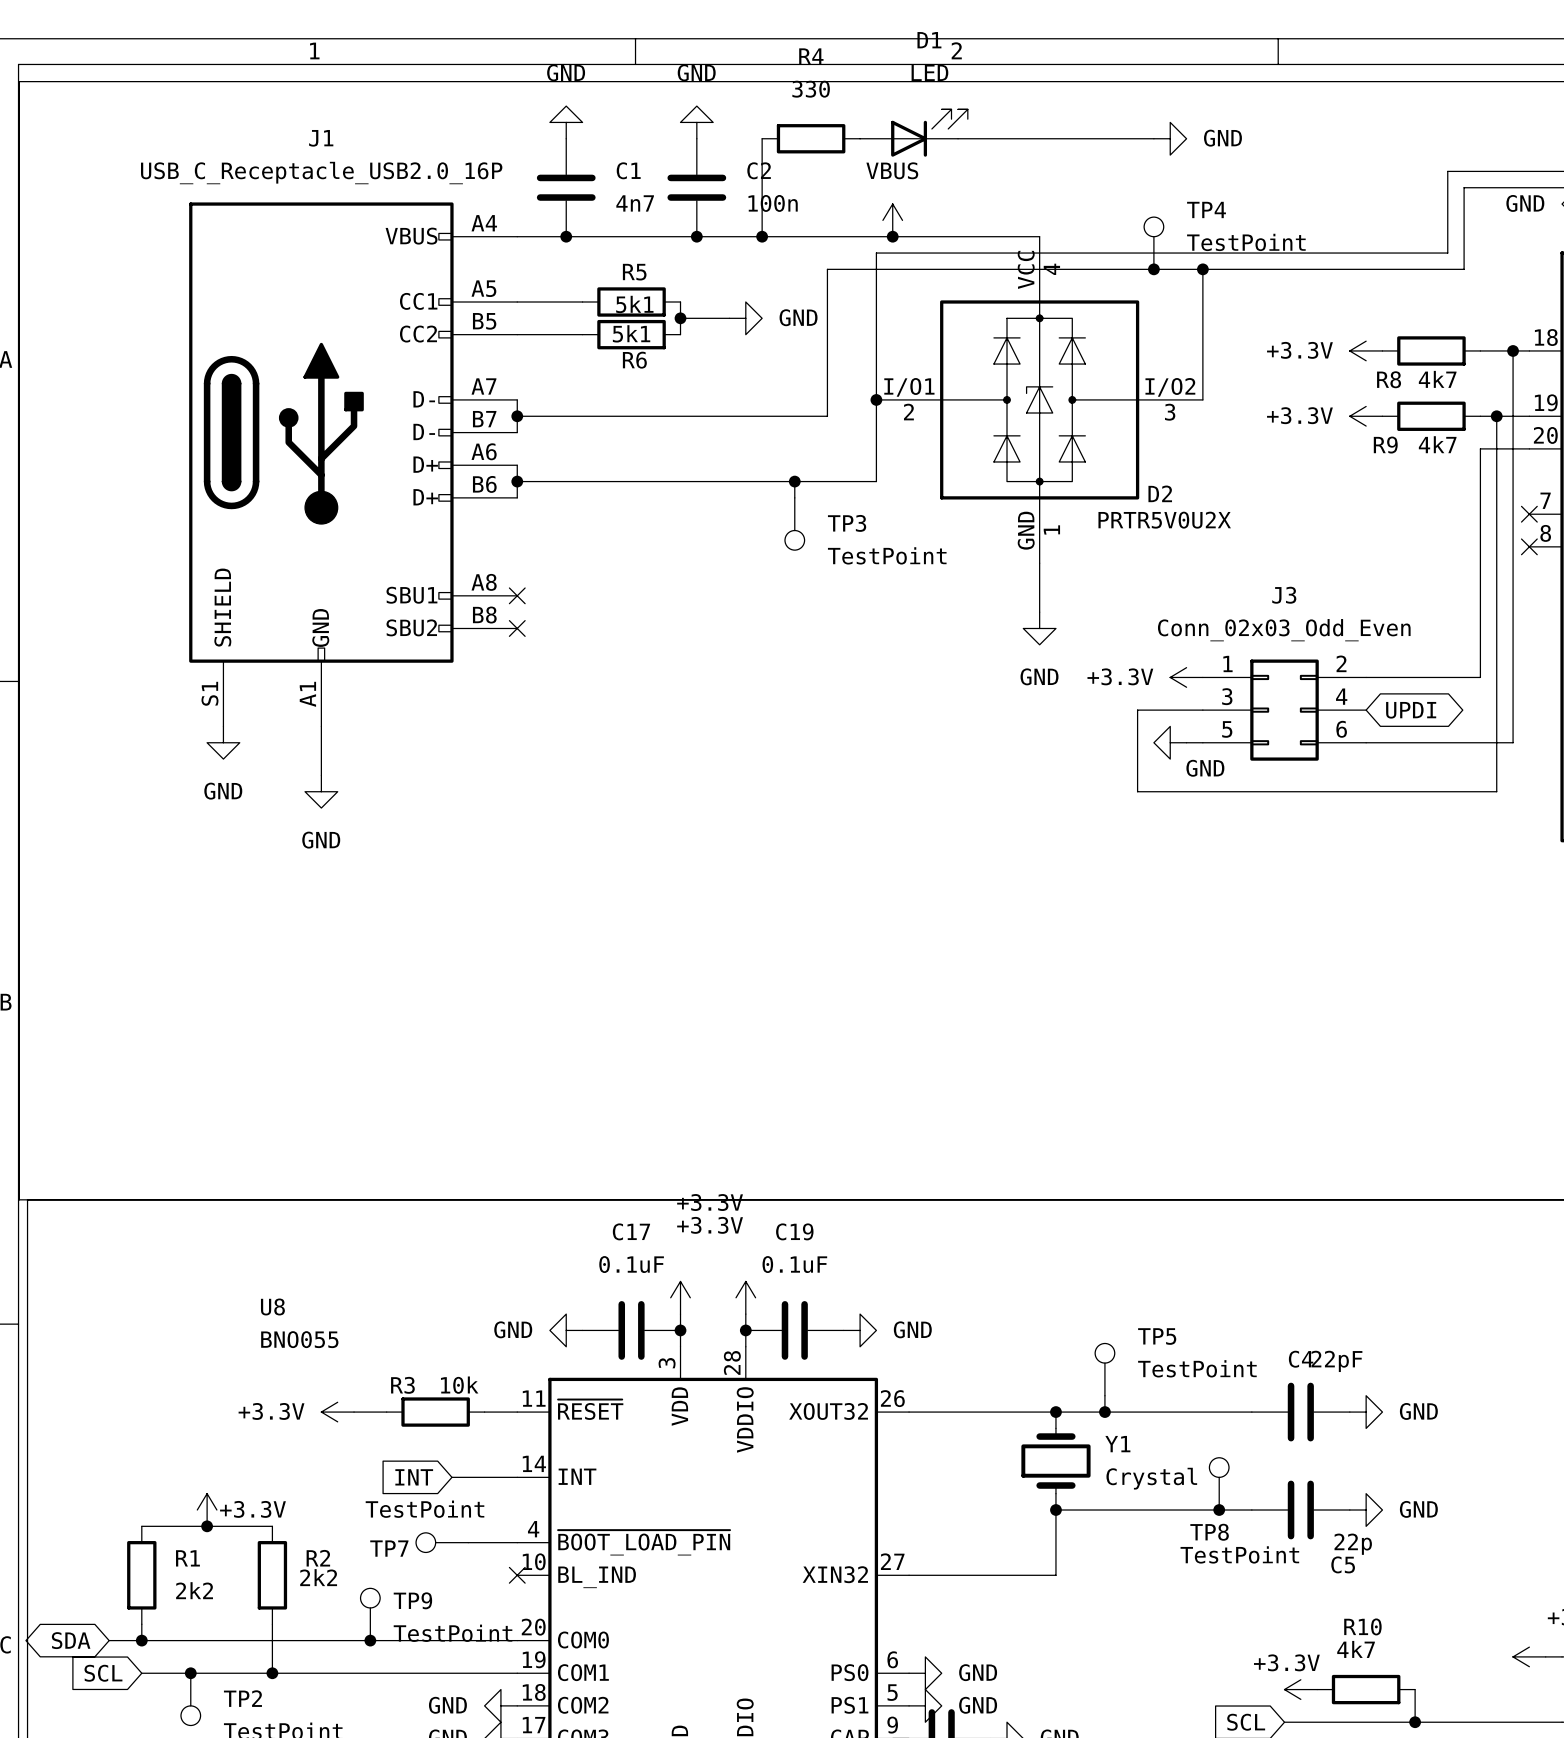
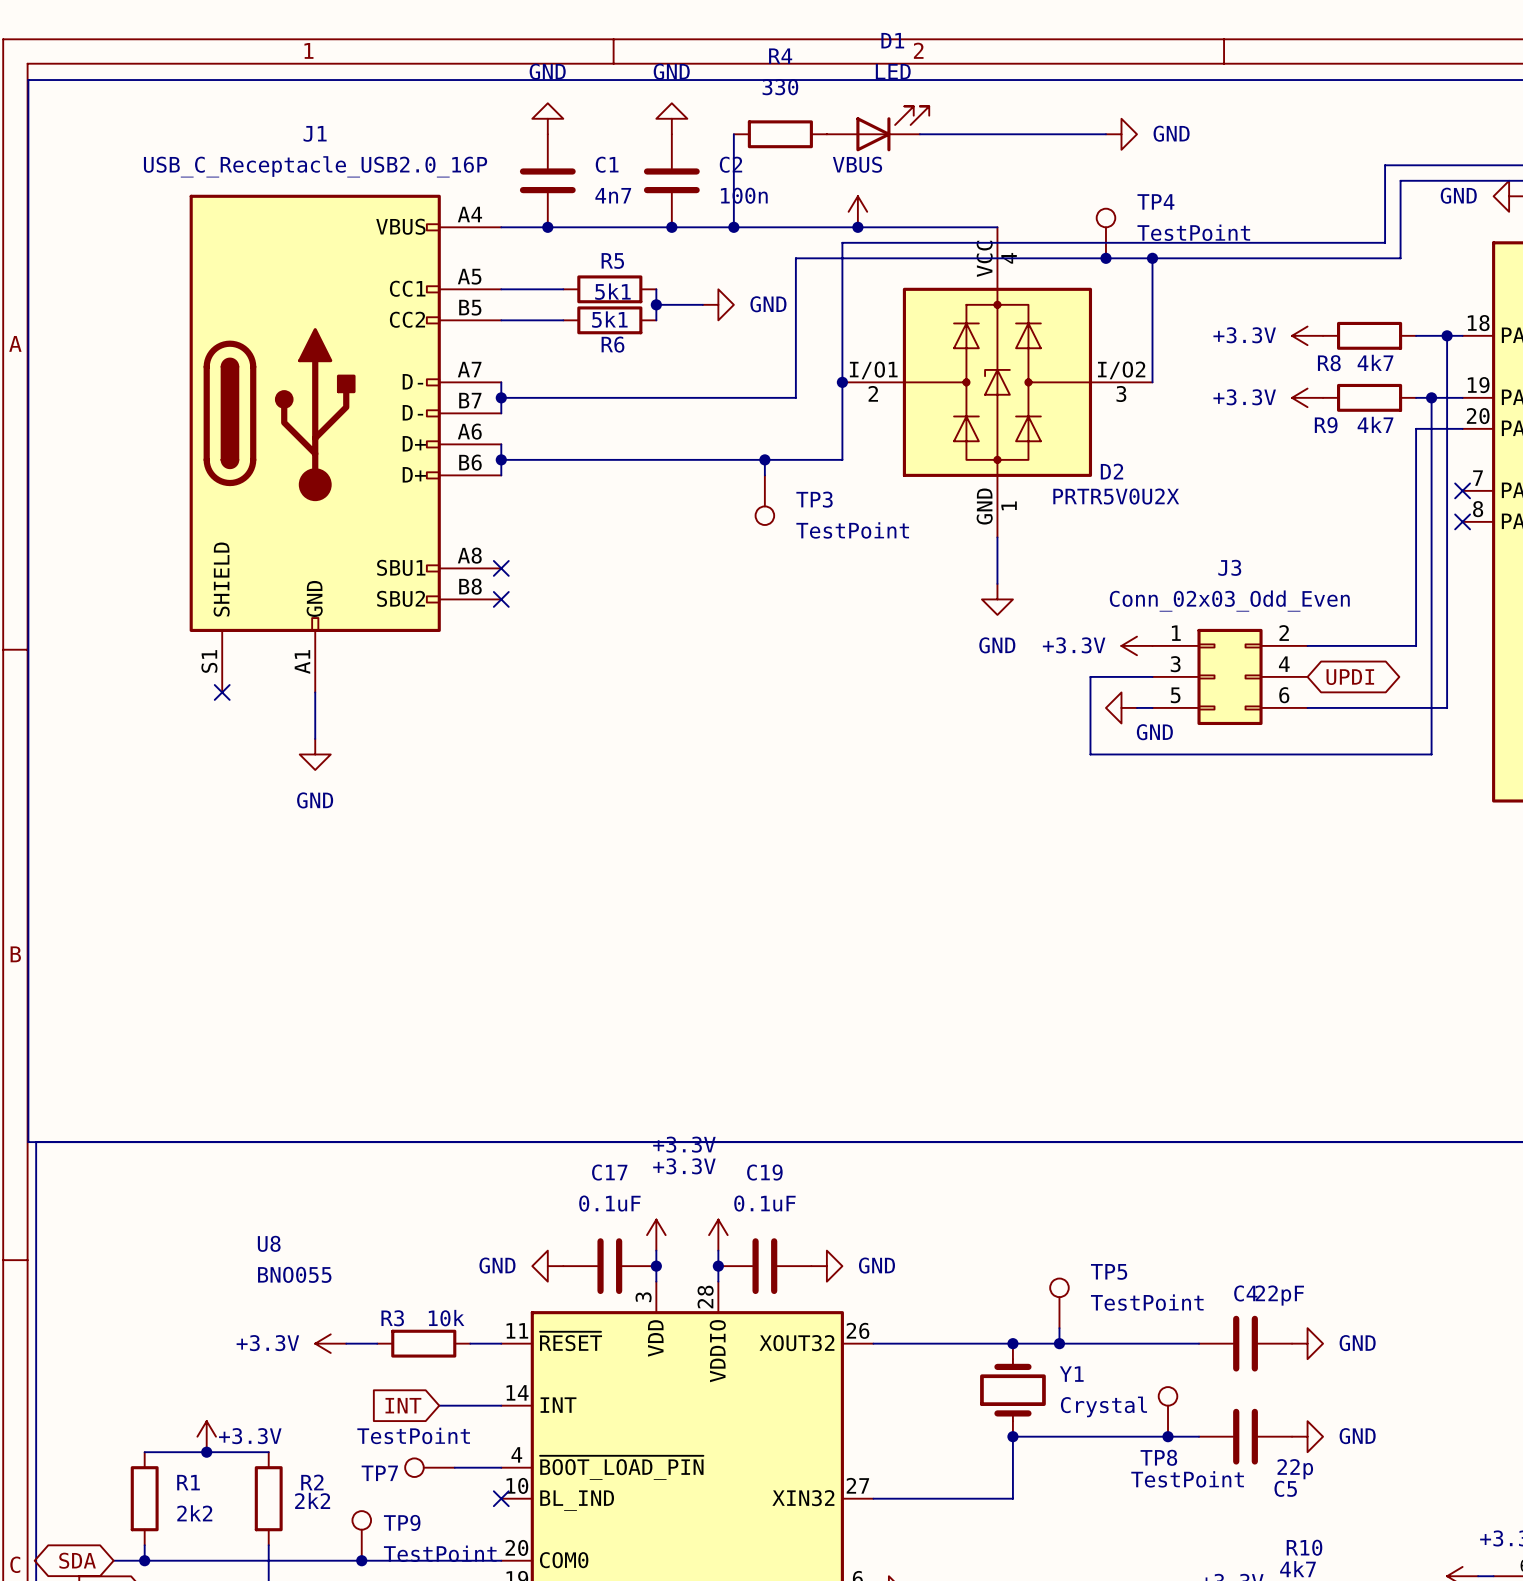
no-connect mark: none -> (222, 692)
power symbol: GND (223, 742) -> none

